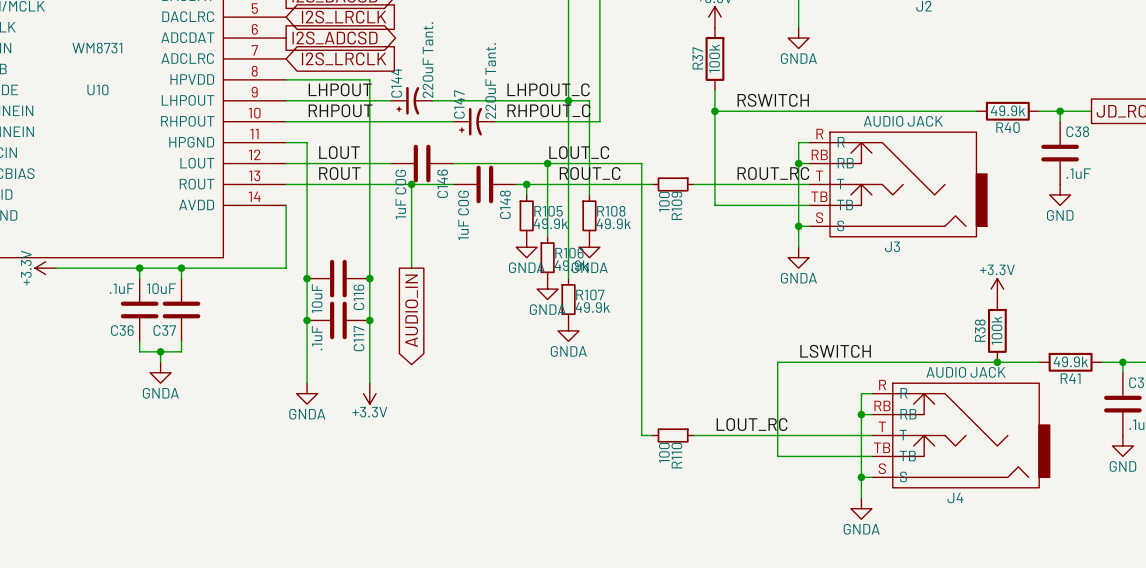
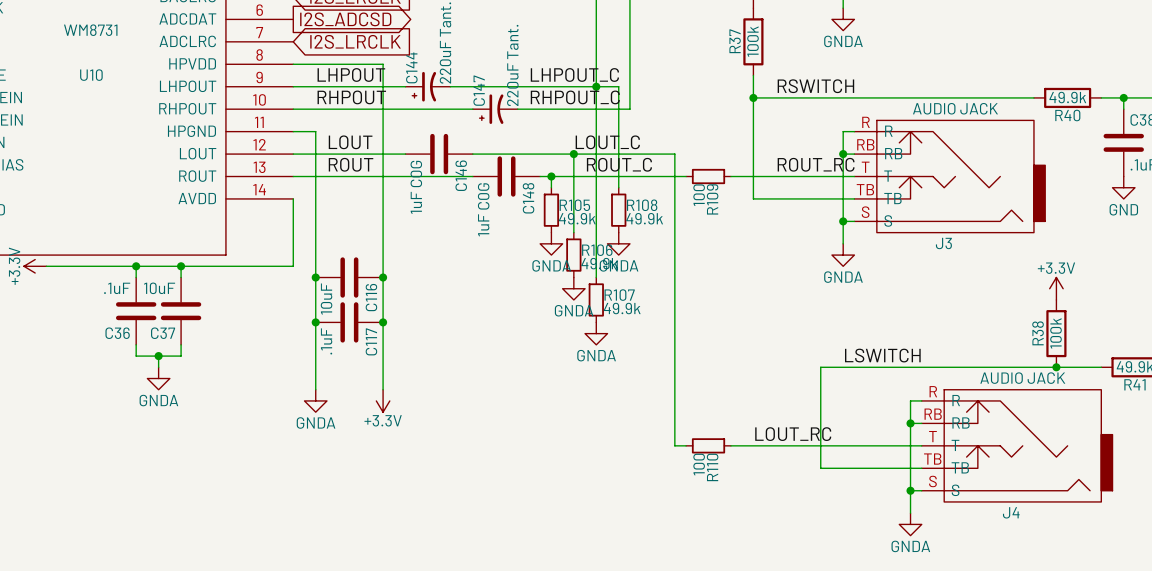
wire: (411, 184) (411, 268) -> none
junction: (411, 184) -> none
global label: AUDIO_IN (411, 310) -> none

